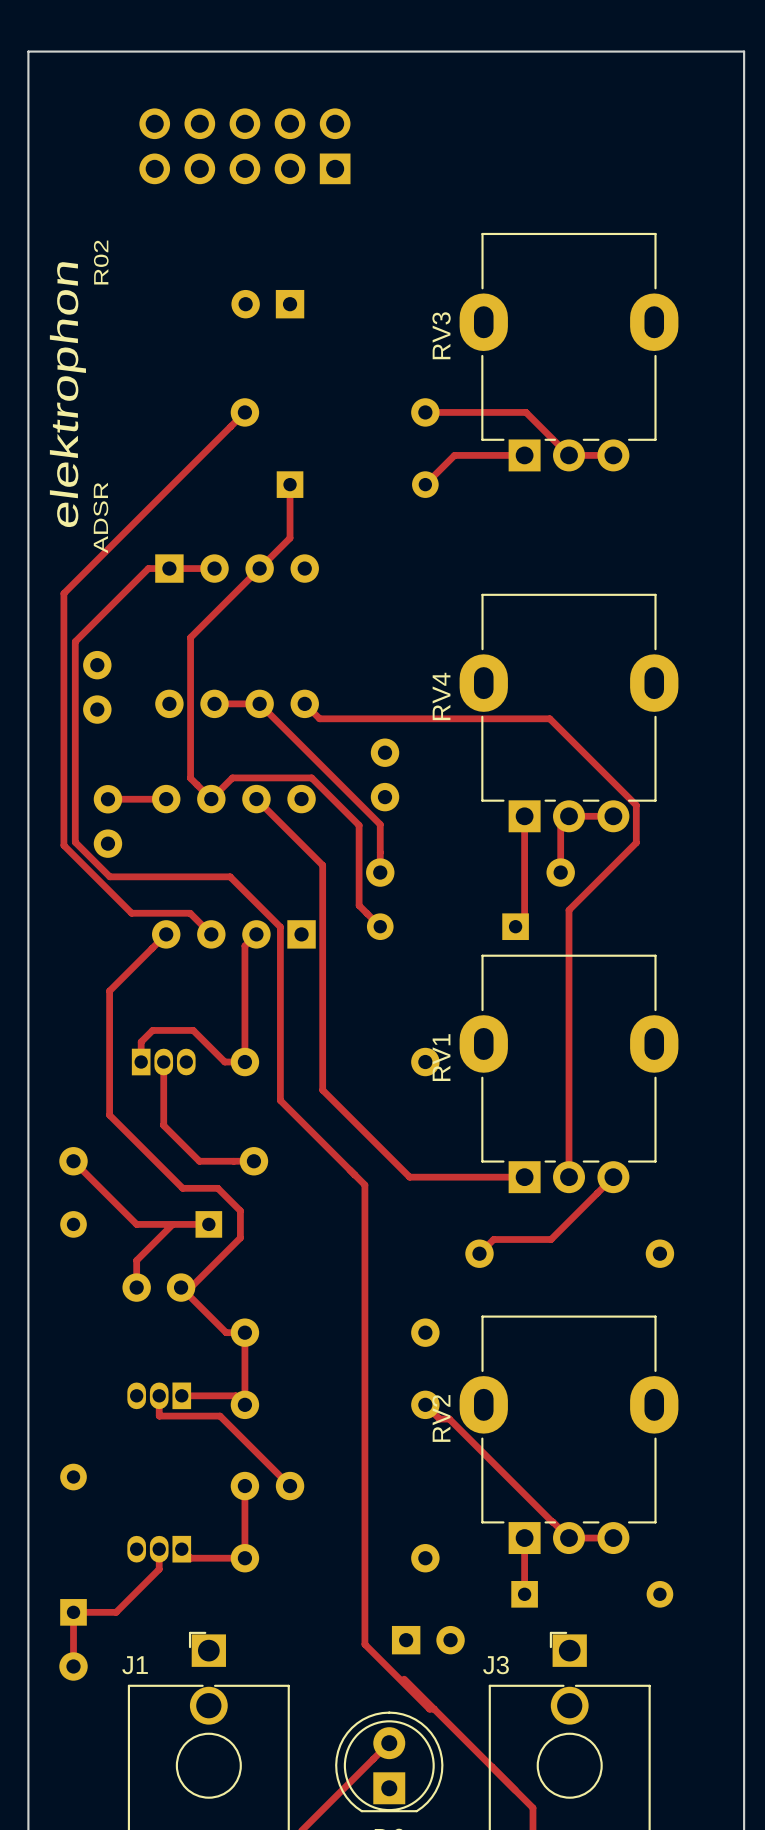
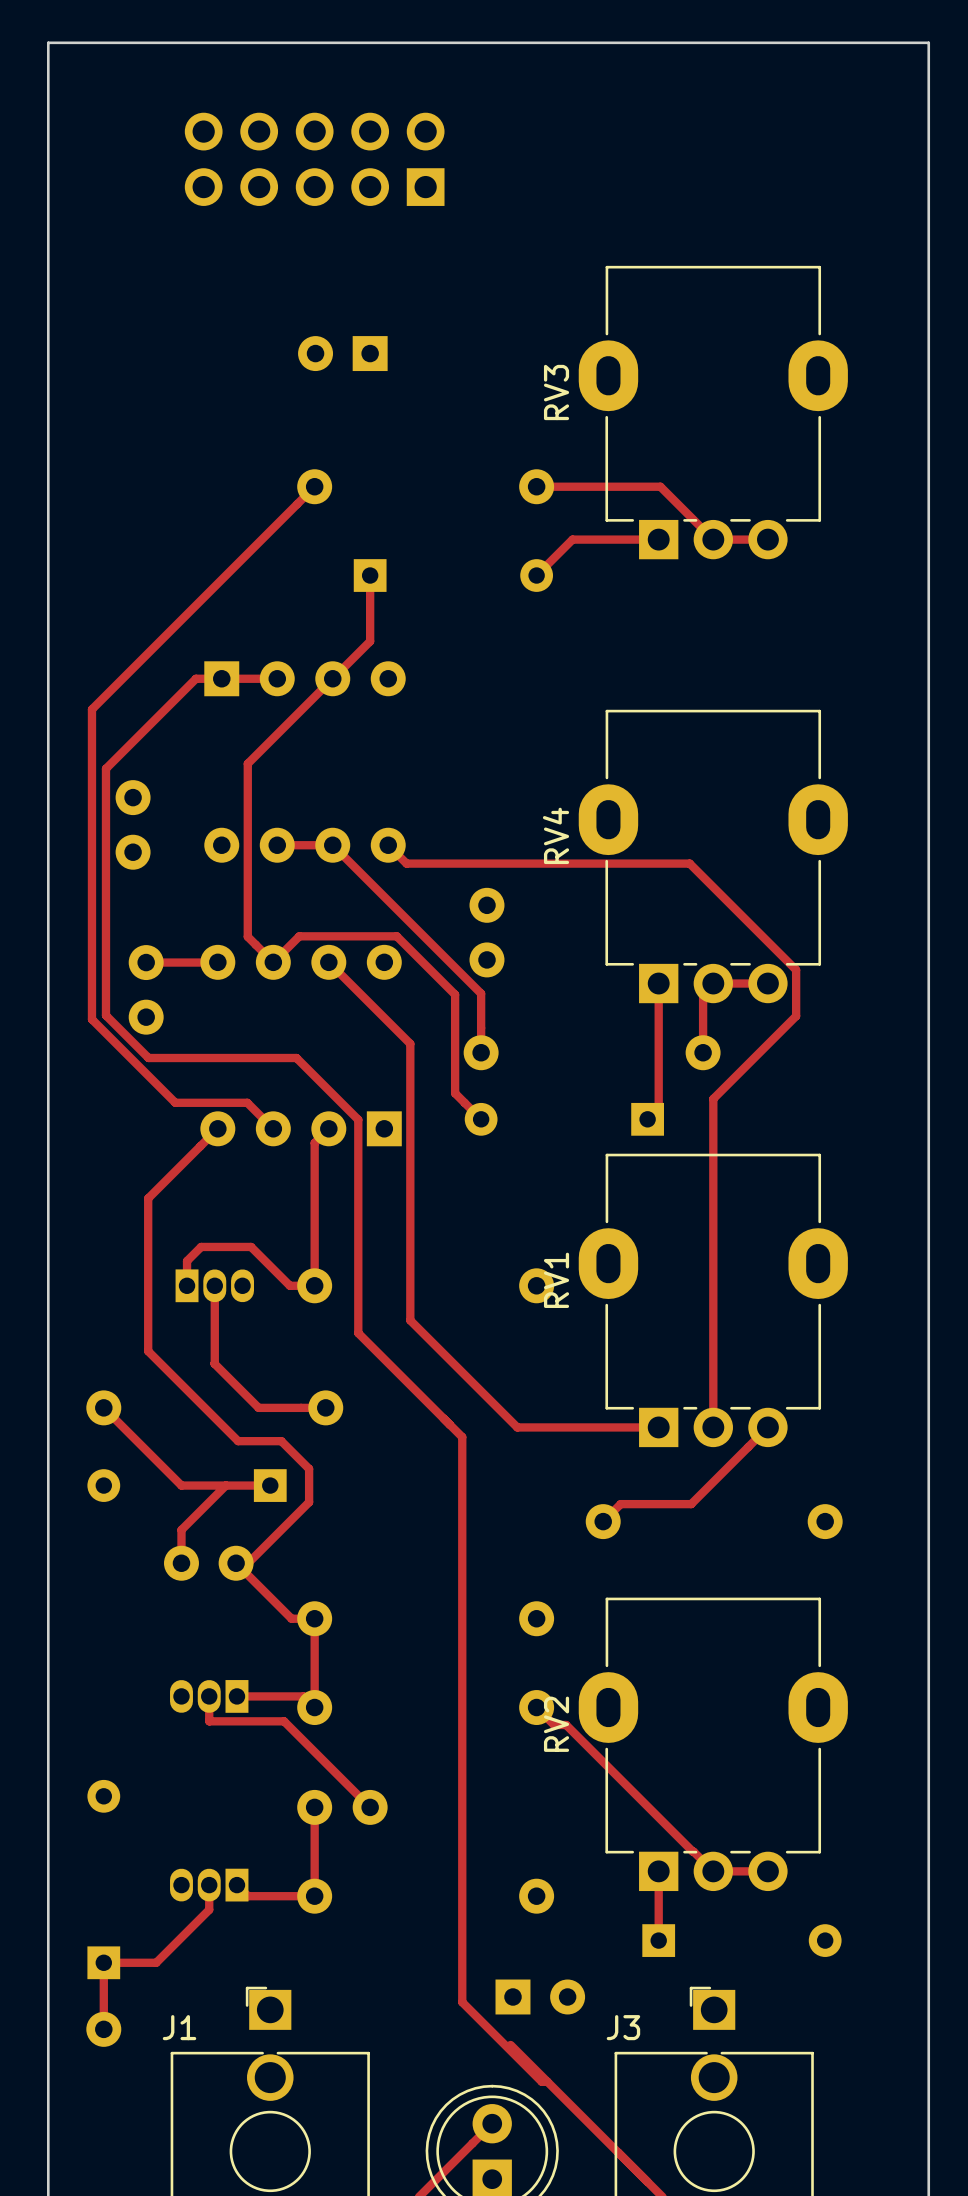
drawing: [49, 240, 109, 554] -> none

